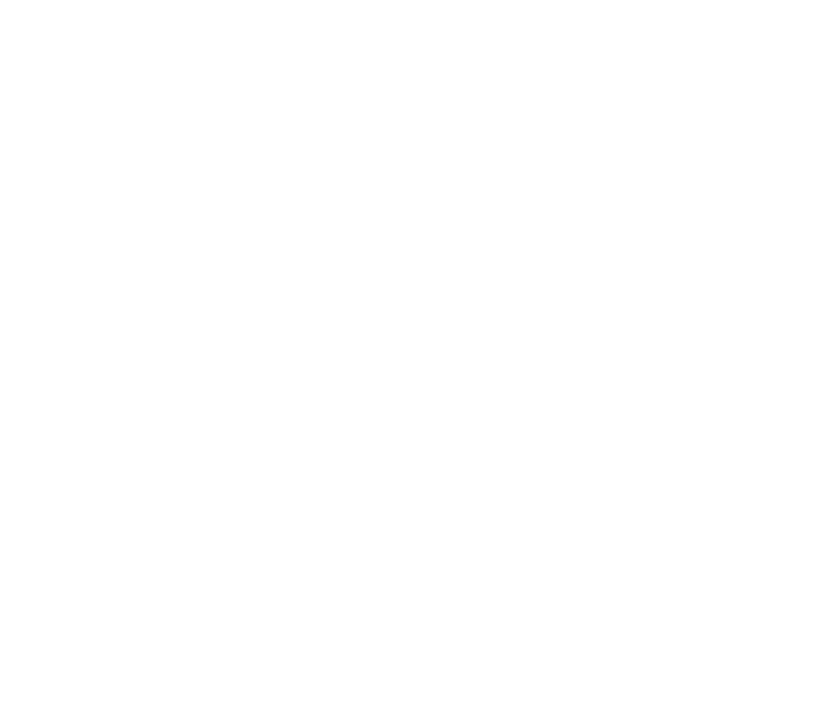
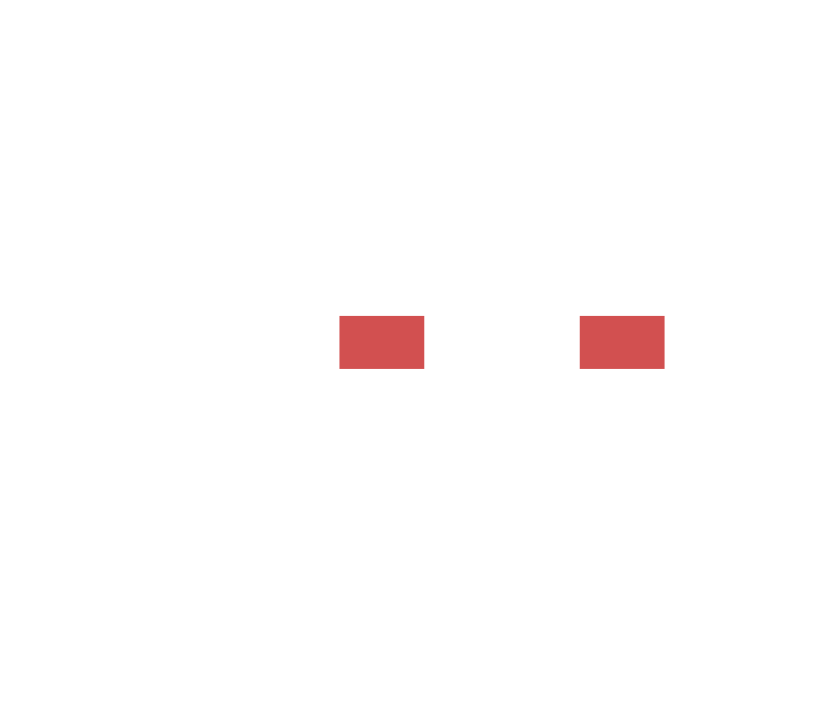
part: none -> (502, 342)

